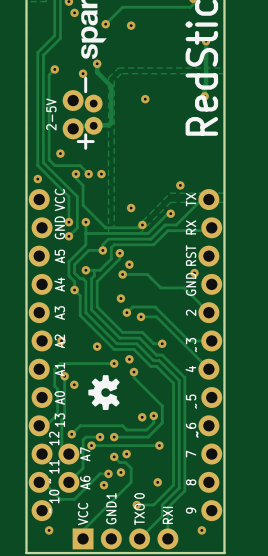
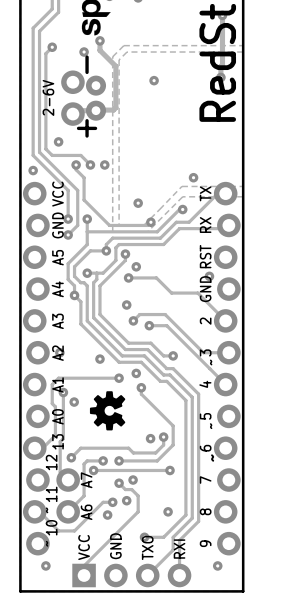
text: 2-5V (51, 114) -> 2-6V (48, 97)
text: 1 (111, 495) -> none
text: 0 (139, 495) -> none

